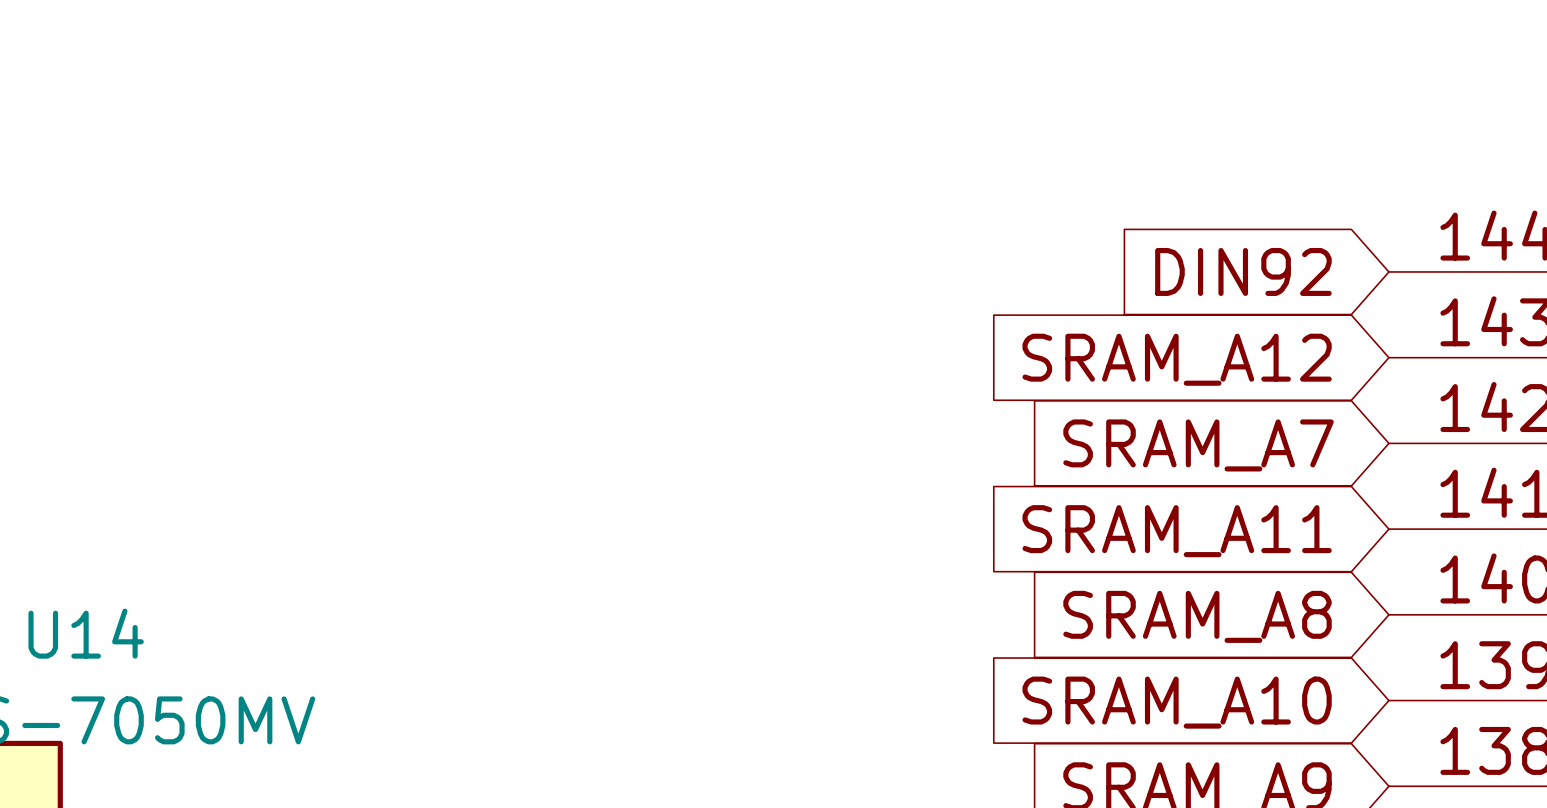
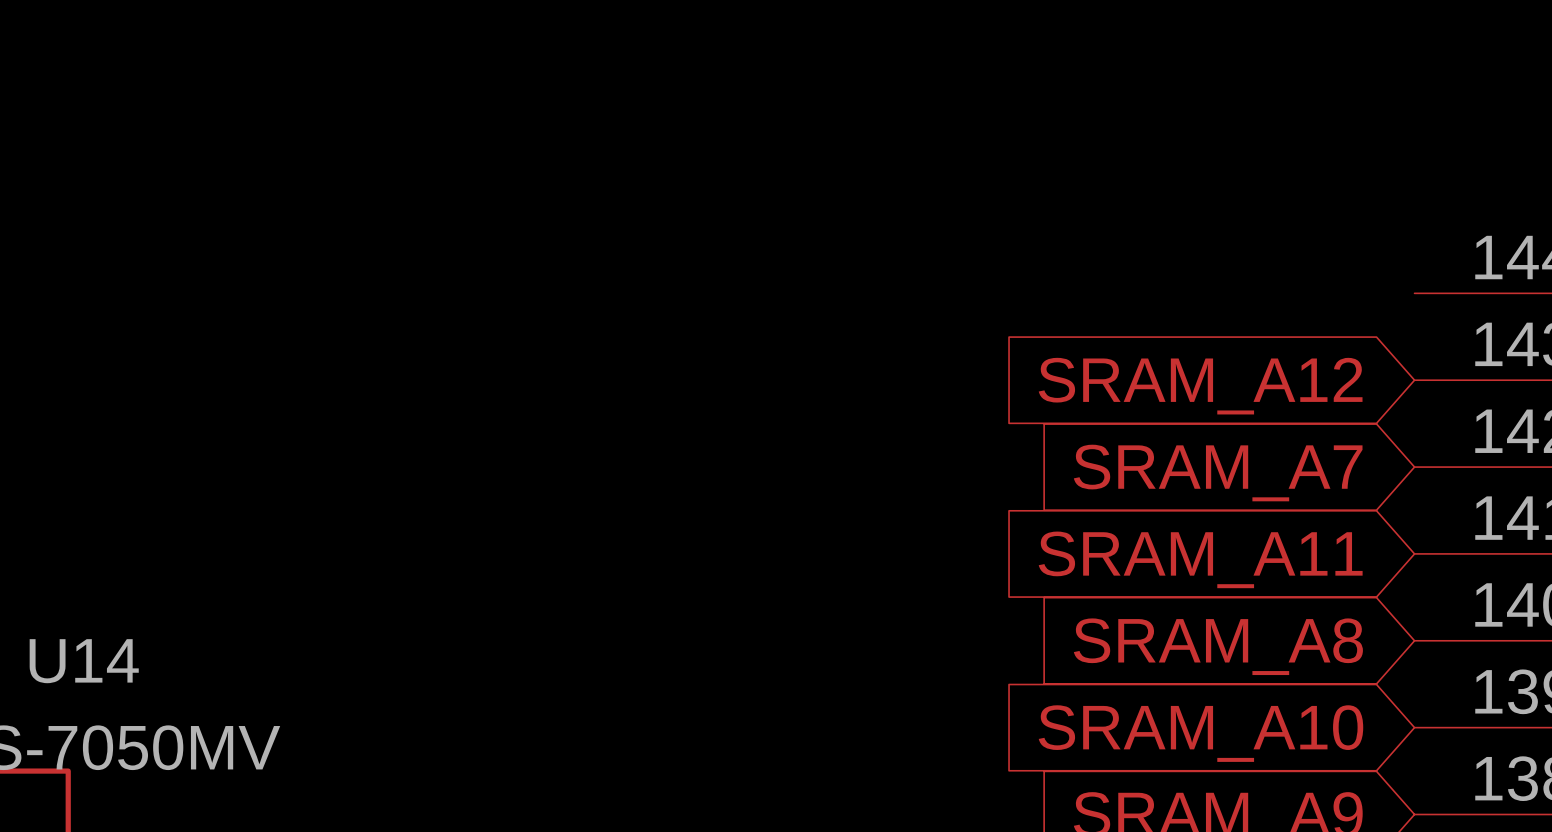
global label: DIN92 (1243, 271) -> none

